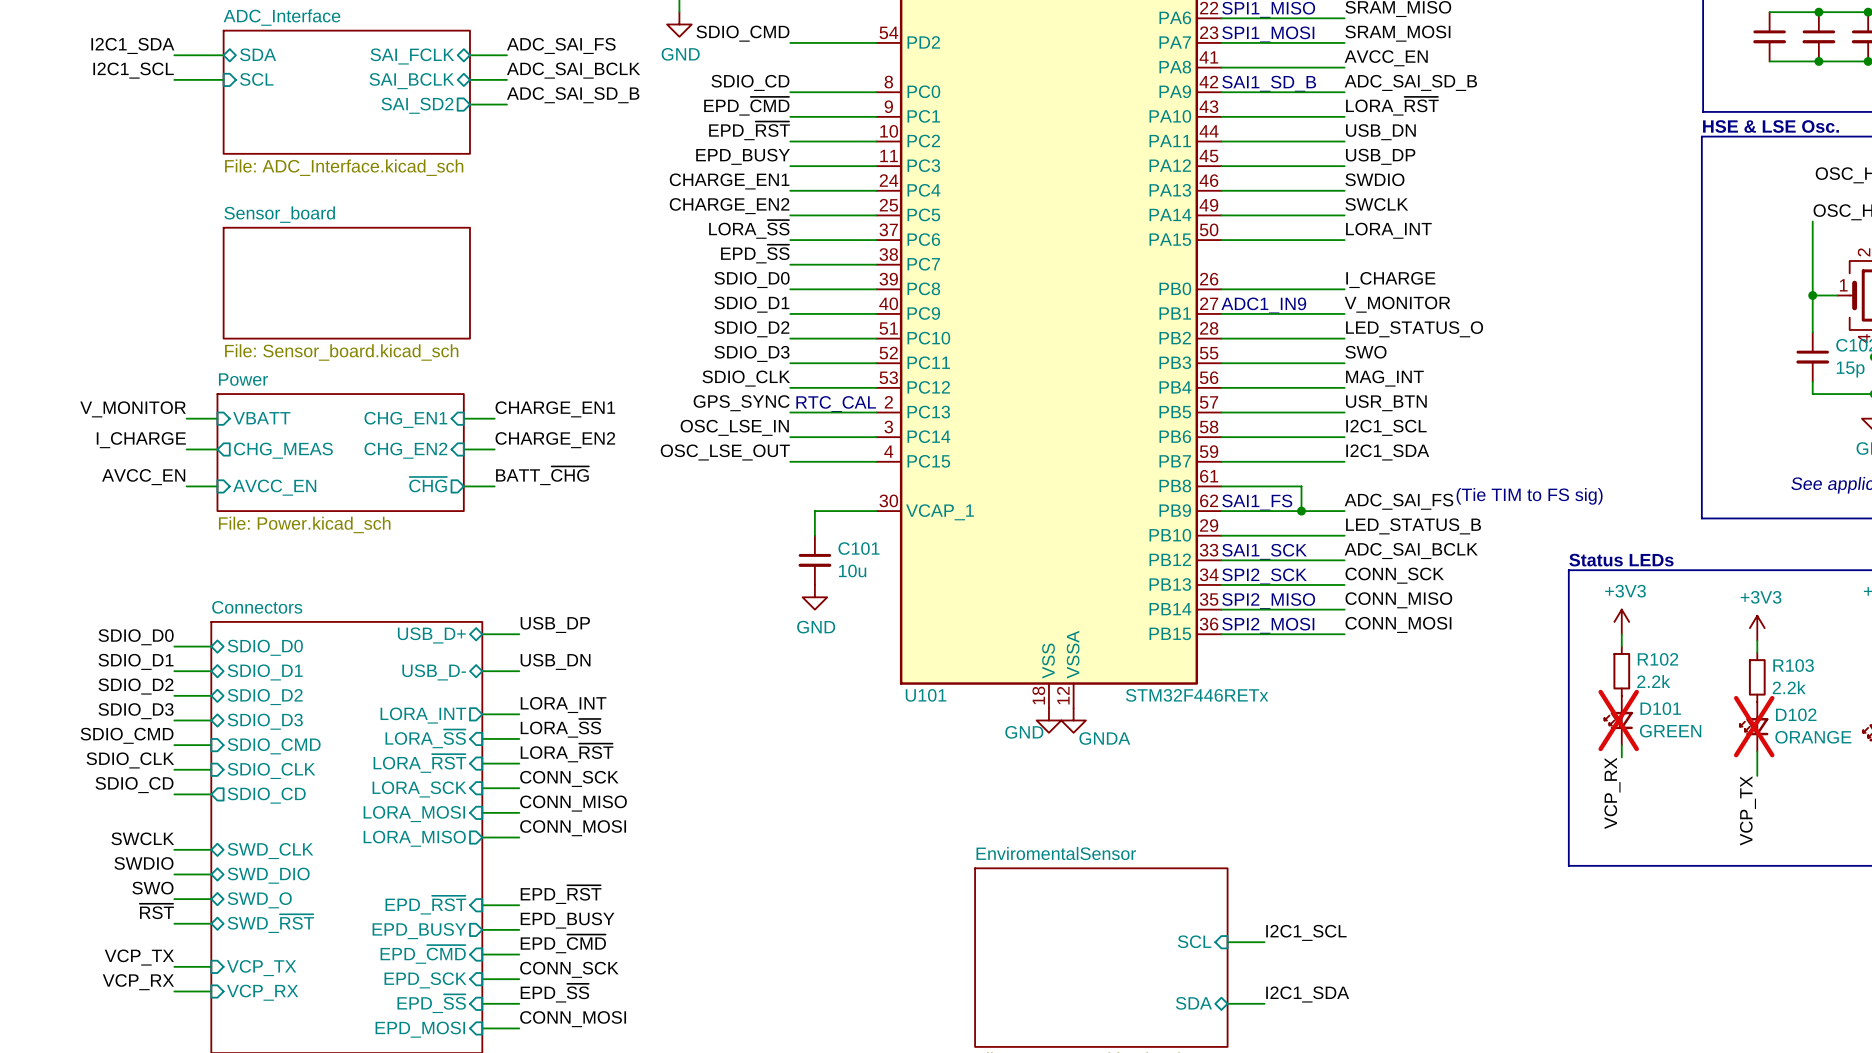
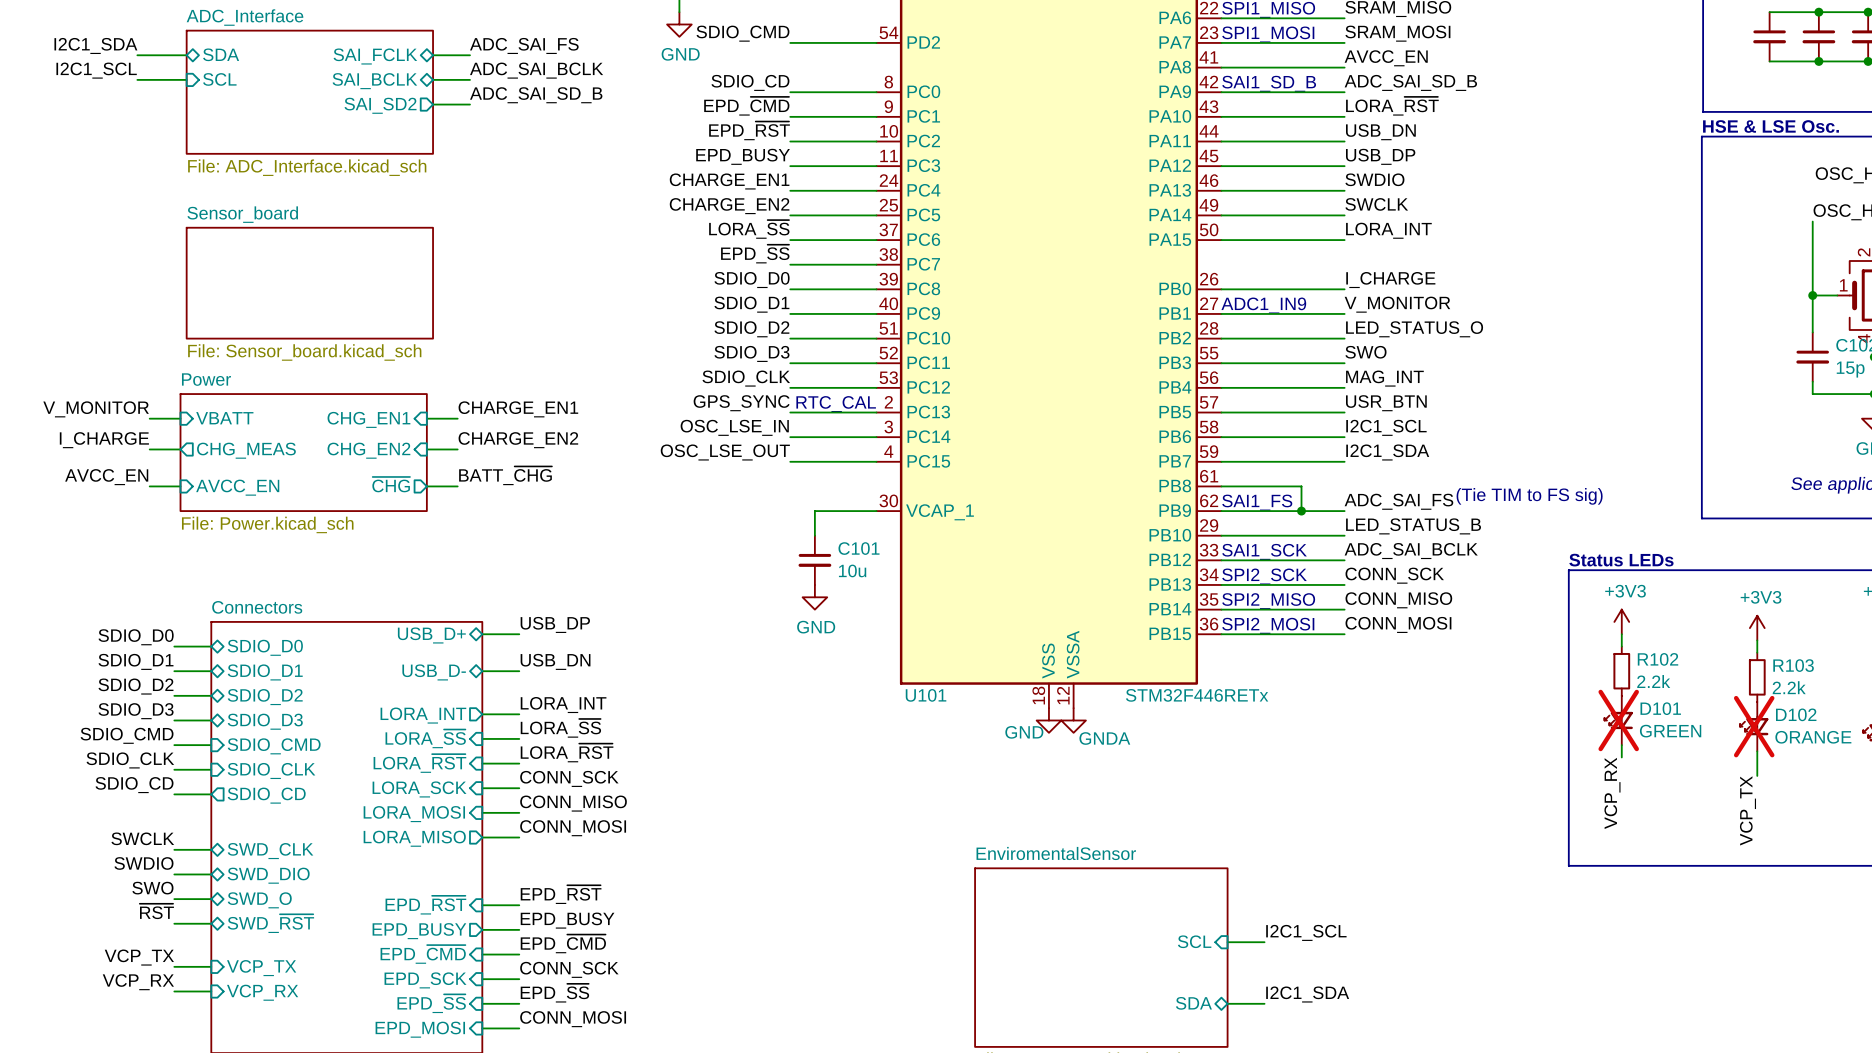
label position: I2C1_SDA (132, 45) -> I2C1_SDA (95, 45)
label position: ADC_SAI_FS (561, 45) -> ADC_SAI_FS (524, 45)
sheet pin position: SDA (258, 54) -> SDA (221, 54)
wire: (186, 55) (223, 55) -> (137, 55) (174, 55)
wire: (469, 55) (506, 55) -> (469, 55) (433, 55)
sheet pin position: SAI_FCLK (412, 56) -> SAI_FCLK (375, 56)
label position: I2C1_SCL (133, 70) -> I2C1_SCL (96, 70)
label position: ADC_SAI_BCLK (573, 70) -> ADC_SAI_BCLK (536, 70)
wire: (186, 79) (223, 79) -> (137, 79) (174, 79)
sheet pin position: SCL (256, 79) -> SCL (219, 79)
wire: (469, 79) (506, 79) -> (469, 79) (433, 79)
sheet pin position: SAI_BCLK (411, 81) -> SAI_BCLK (374, 81)
sheet ADC_Interface position: (346, 92) -> (309, 92)
label position: ADC_SAI_SD_B (573, 95) -> ADC_SAI_SD_B (536, 95)
wire: (469, 104) (506, 104) -> (469, 104) (433, 104)
sheet pin position: SAI_SD2 (417, 105) -> SAI_SD2 (380, 105)
sheet Sensor_board position: (346, 283) -> (309, 283)
label position: V_MONITOR (133, 409) -> V_MONITOR (96, 409)
label position: CHARGE_EN1 (555, 409) -> CHARGE_EN1 (518, 409)
wire: (186, 418) (217, 418) -> (149, 418) (180, 418)
sheet pin position: VBATT (261, 418) -> VBATT (224, 418)
wire: (463, 418) (494, 418) -> (426, 418) (457, 418)
sheet pin position: CHG_EN1 (405, 419) -> CHG_EN1 (368, 419)
label position: I_CHARGE (141, 440) -> I_CHARGE (104, 440)
label position: CHARGE_EN2 (555, 440) -> CHARGE_EN2 (518, 440)
wire: (186, 449) (217, 449) -> (149, 449) (180, 449)
wire: (463, 449) (494, 449) -> (426, 449) (457, 449)
sheet pin position: CHG_MEAS (283, 450) -> CHG_MEAS (246, 450)
sheet pin position: CHG_EN2 (405, 450) -> CHG_EN2 (368, 450)
sheet Power position: (340, 452) -> (303, 452)
label position: BATT_~{CHG} (542, 475) -> BATT_~{CHG} (505, 475)
label position: AVCC_EN (143, 477) -> AVCC_EN (106, 477)
sheet pin position: ~{CHG} (428, 484) -> ~{CHG} (391, 484)
wire: (186, 486) (217, 486) -> (149, 486) (180, 486)
wire: (463, 486) (494, 486) -> (426, 486) (457, 486)
sheet pin position: AVCC_EN (274, 487) -> AVCC_EN (237, 487)

